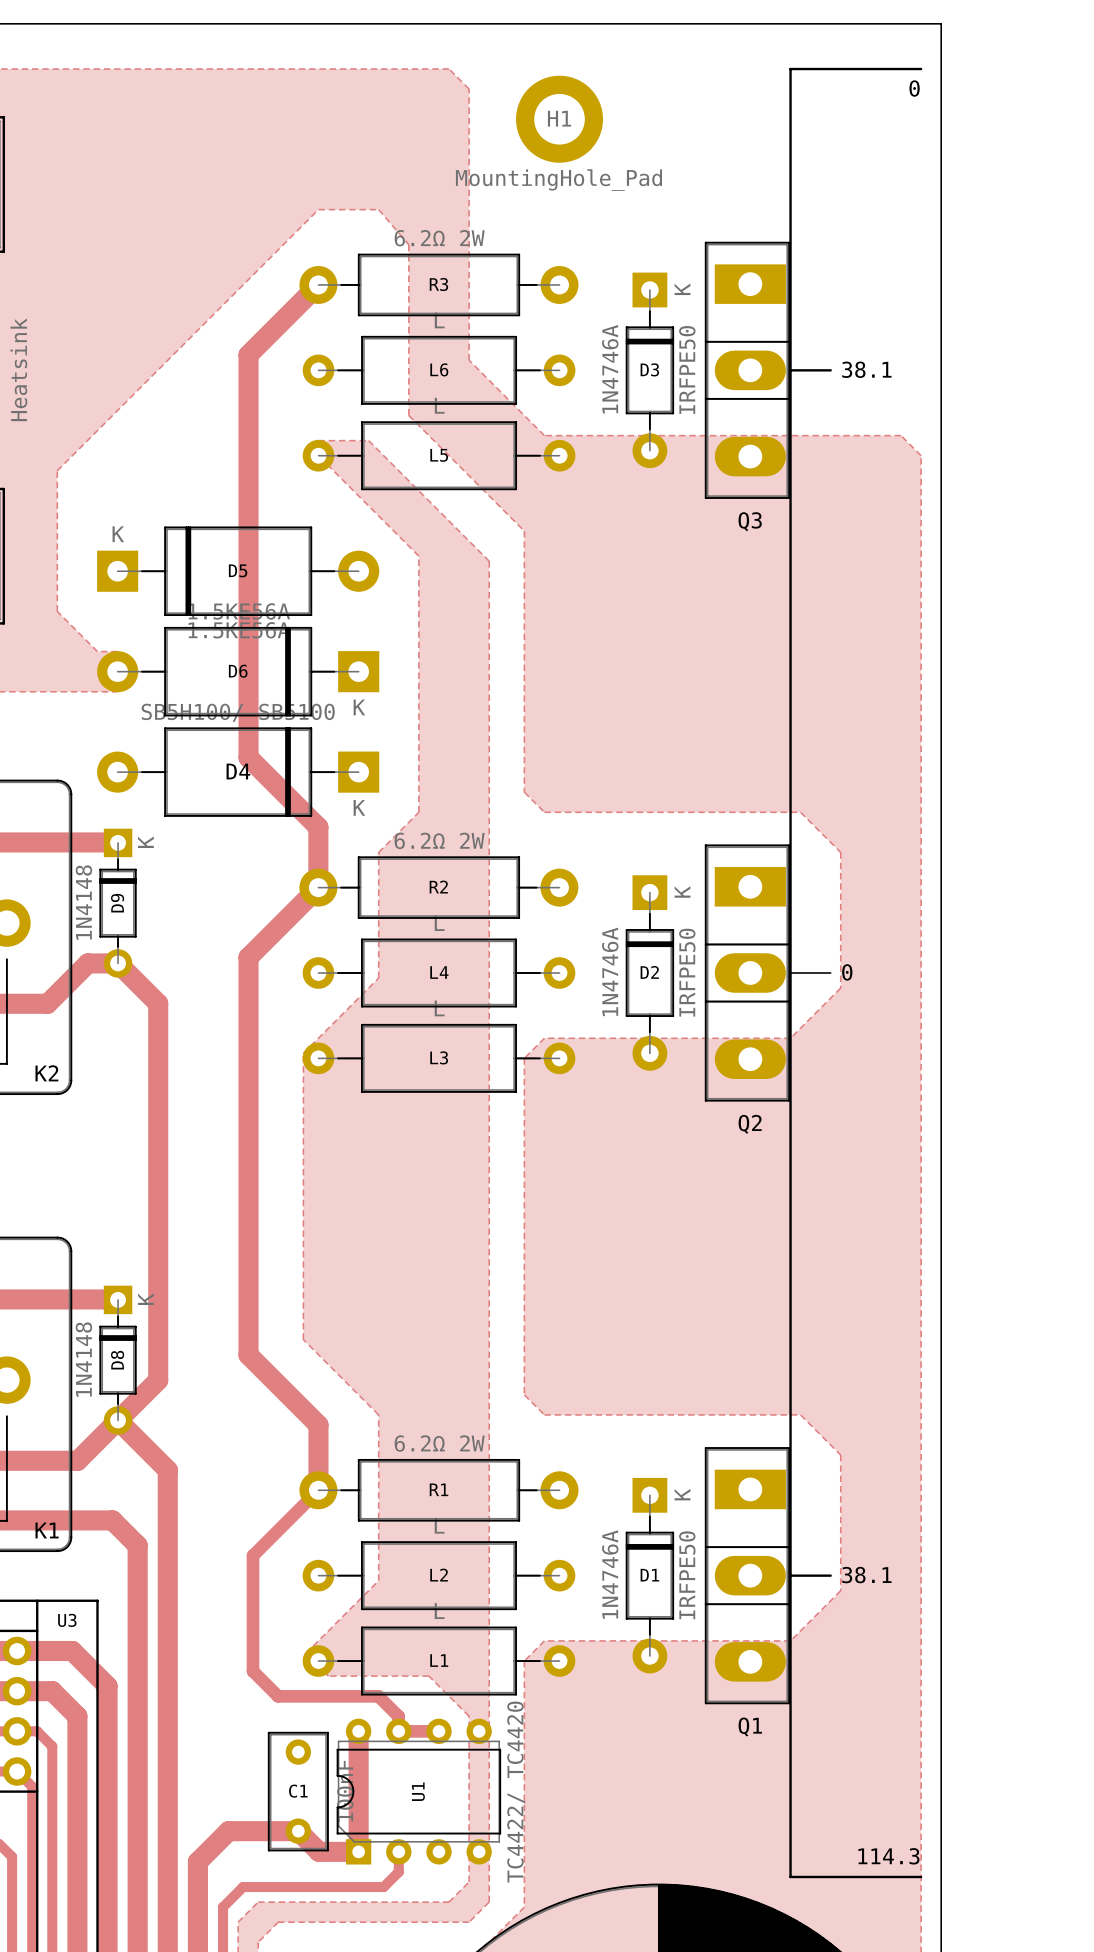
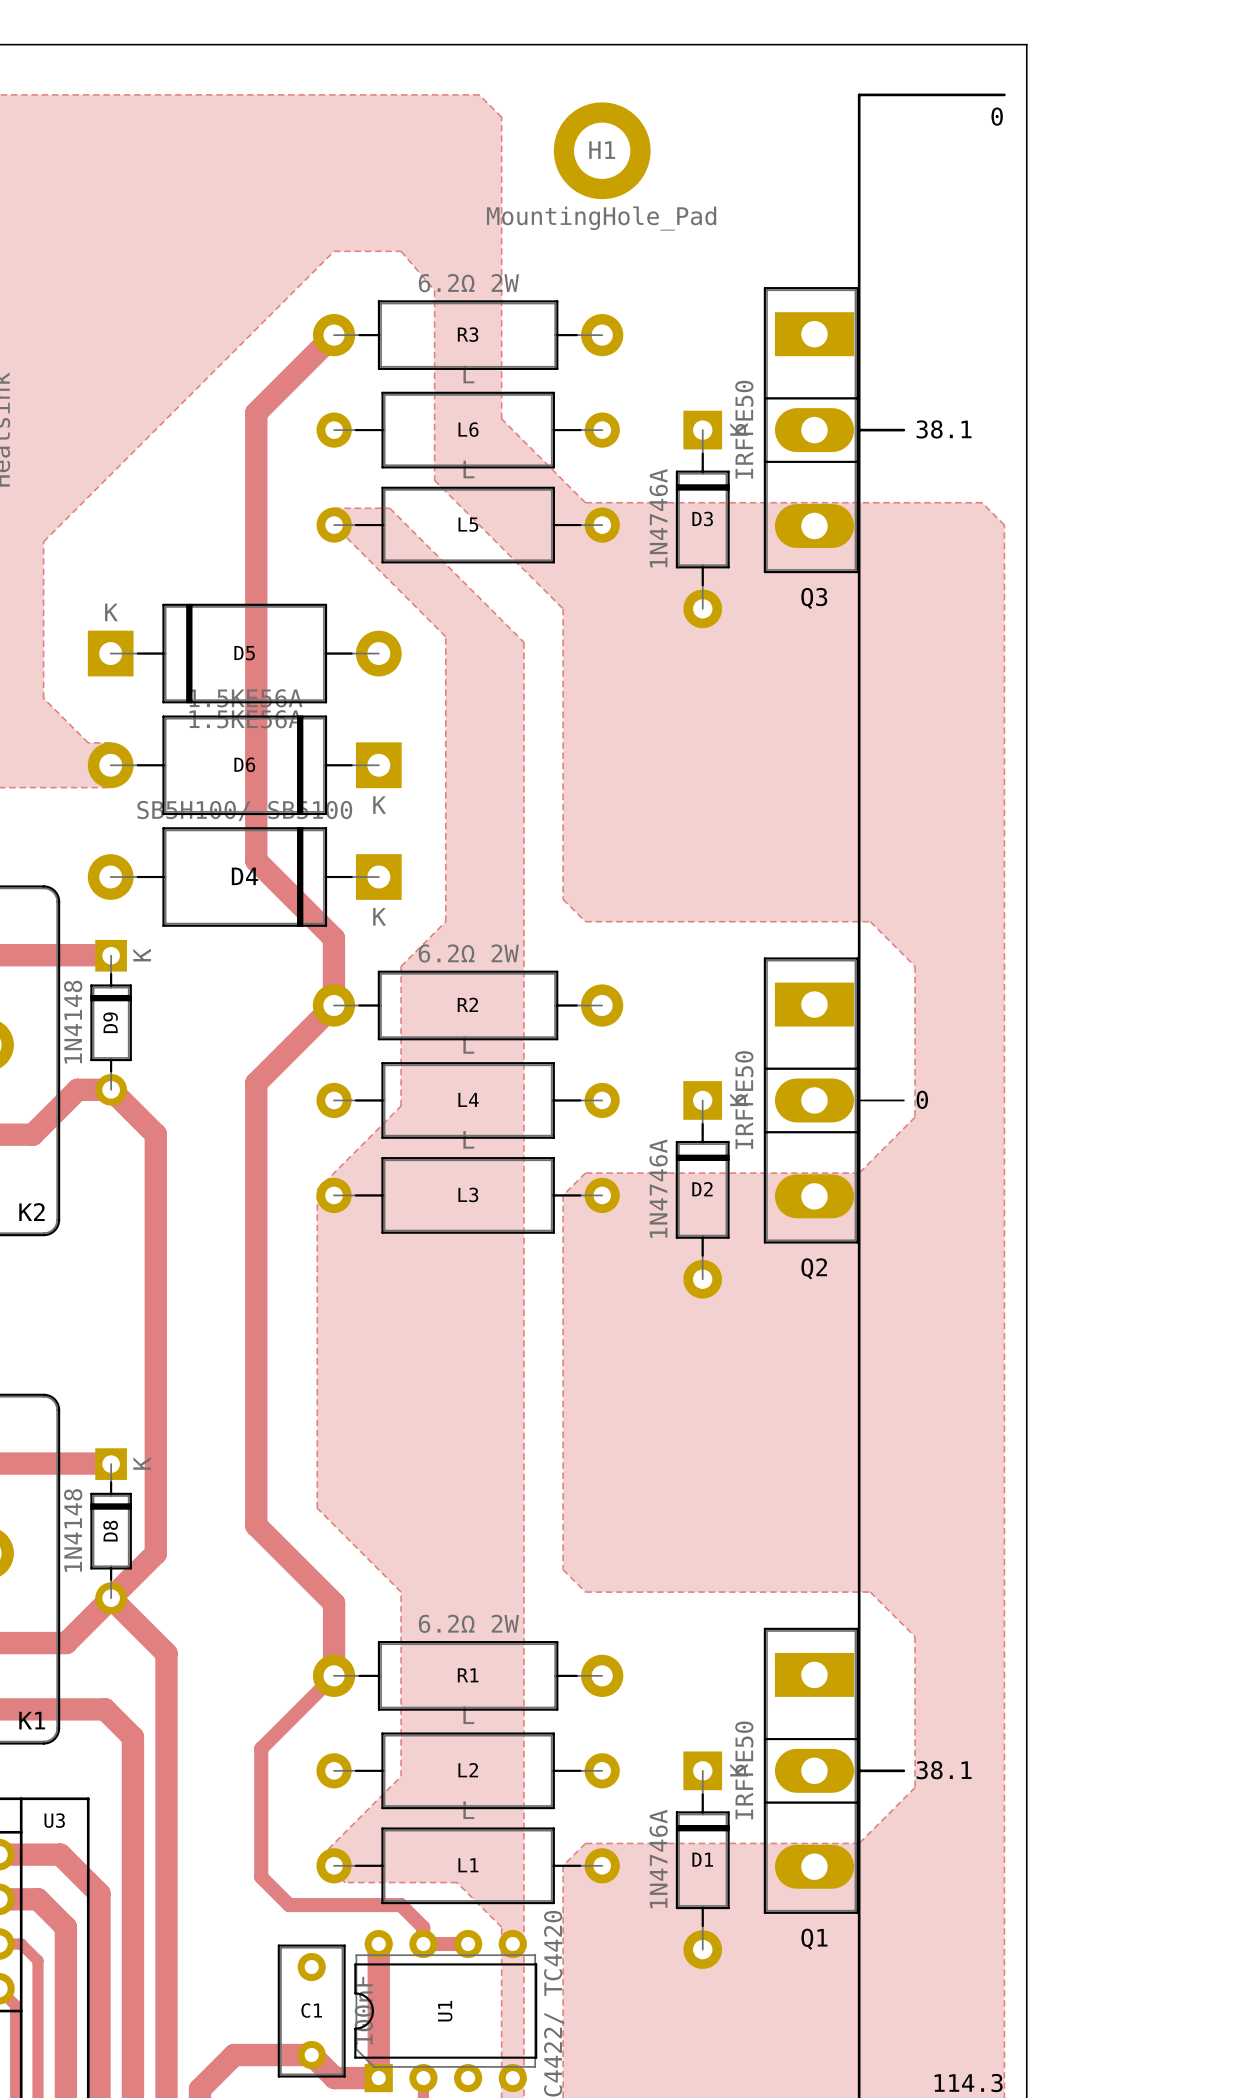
D3 position: (649, 370) -> (702, 519)
D2 position: (649, 973) -> (702, 1189)
D1 position: (649, 1575) -> (702, 1860)

